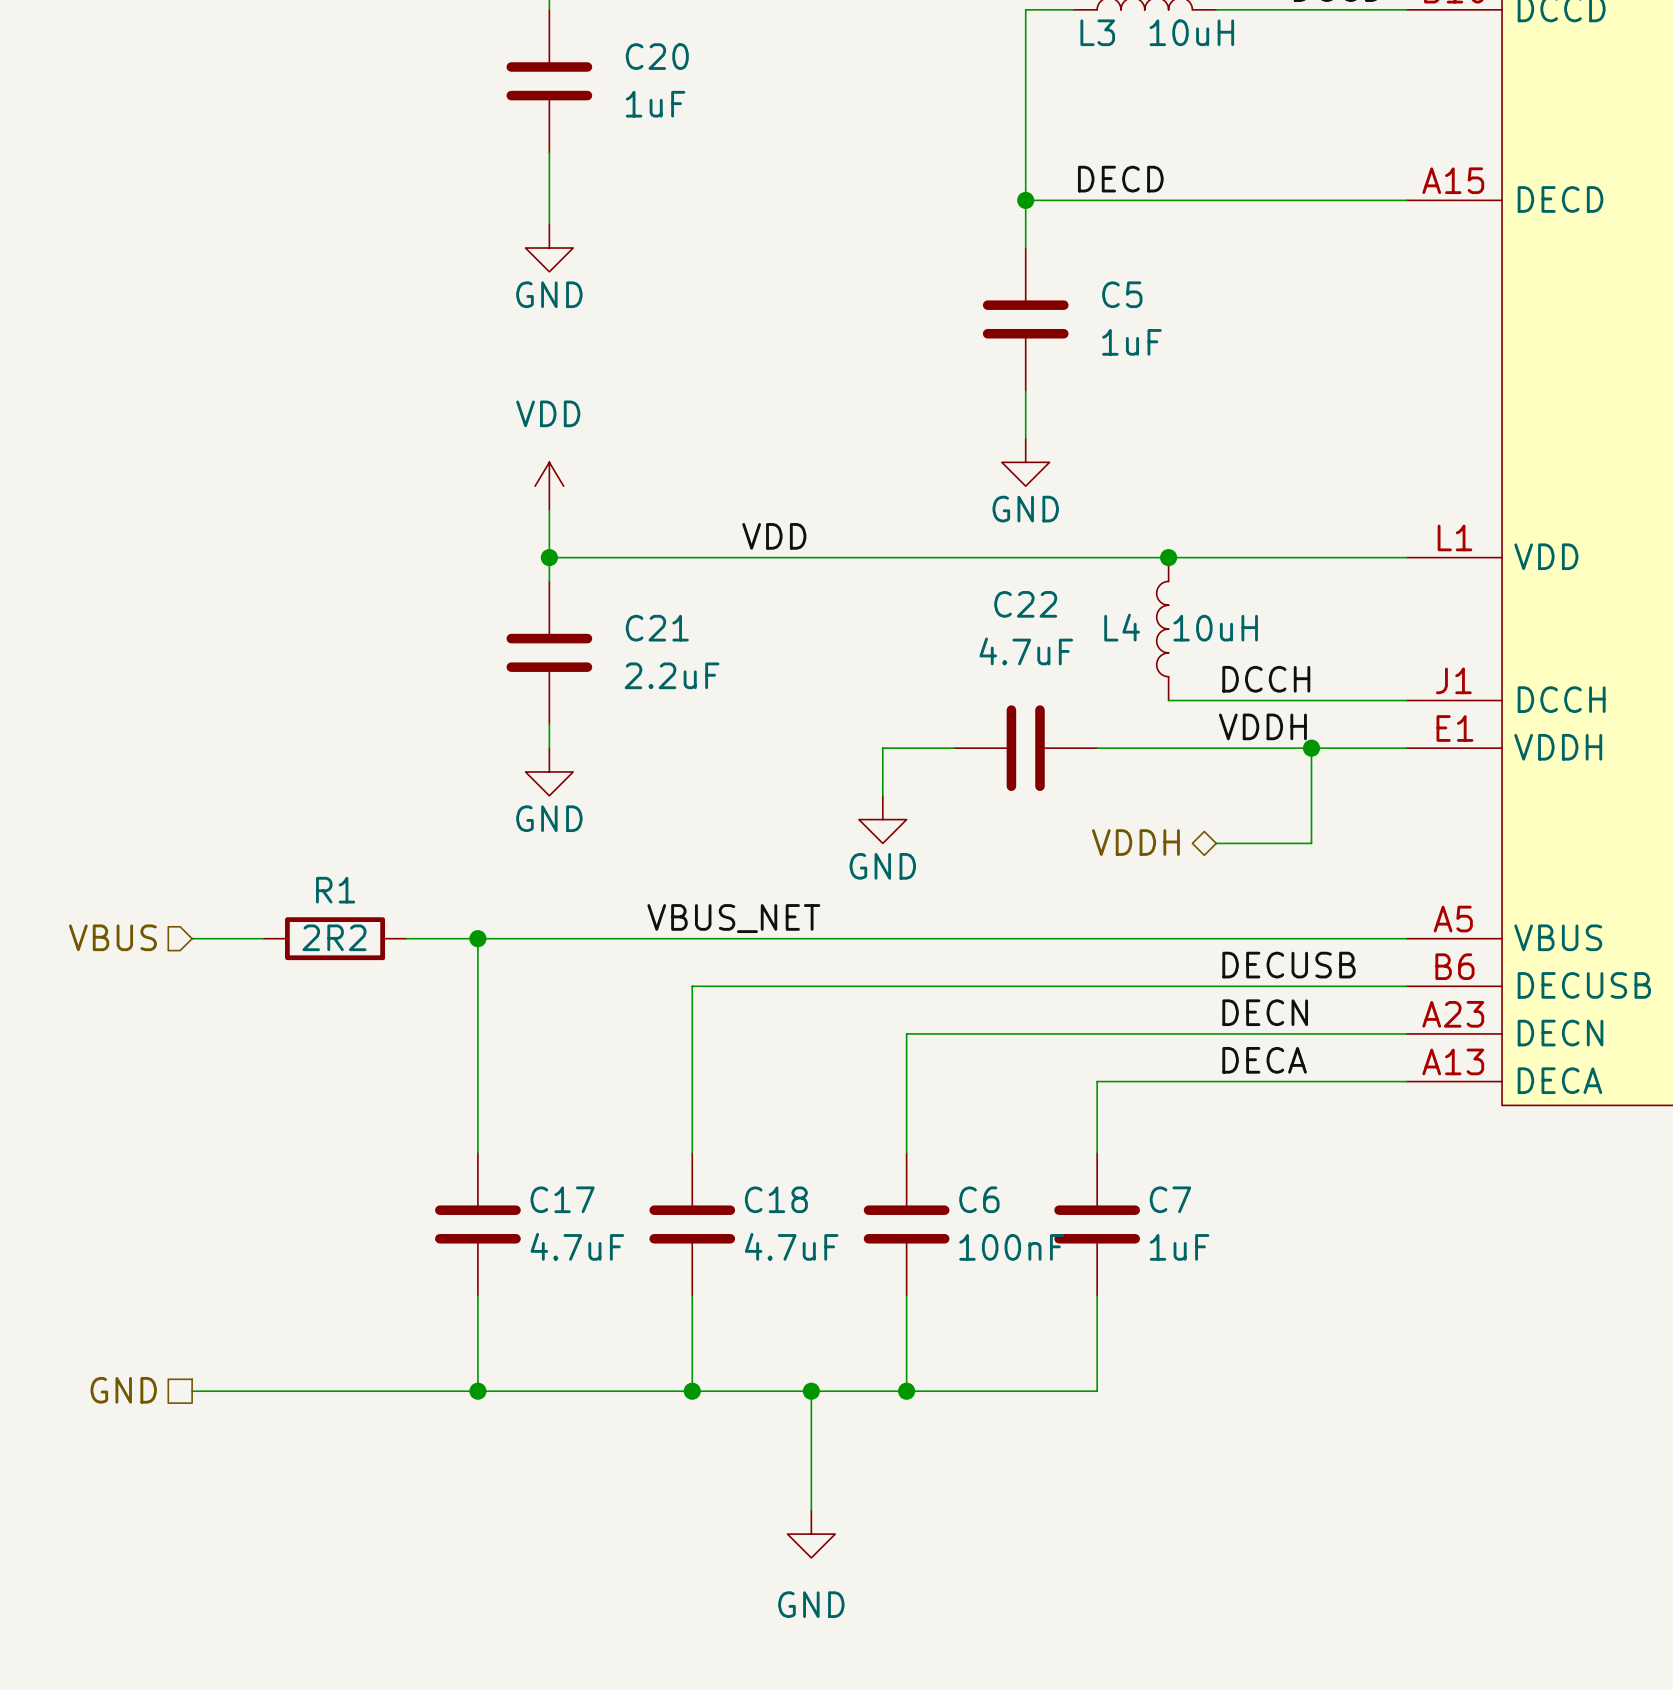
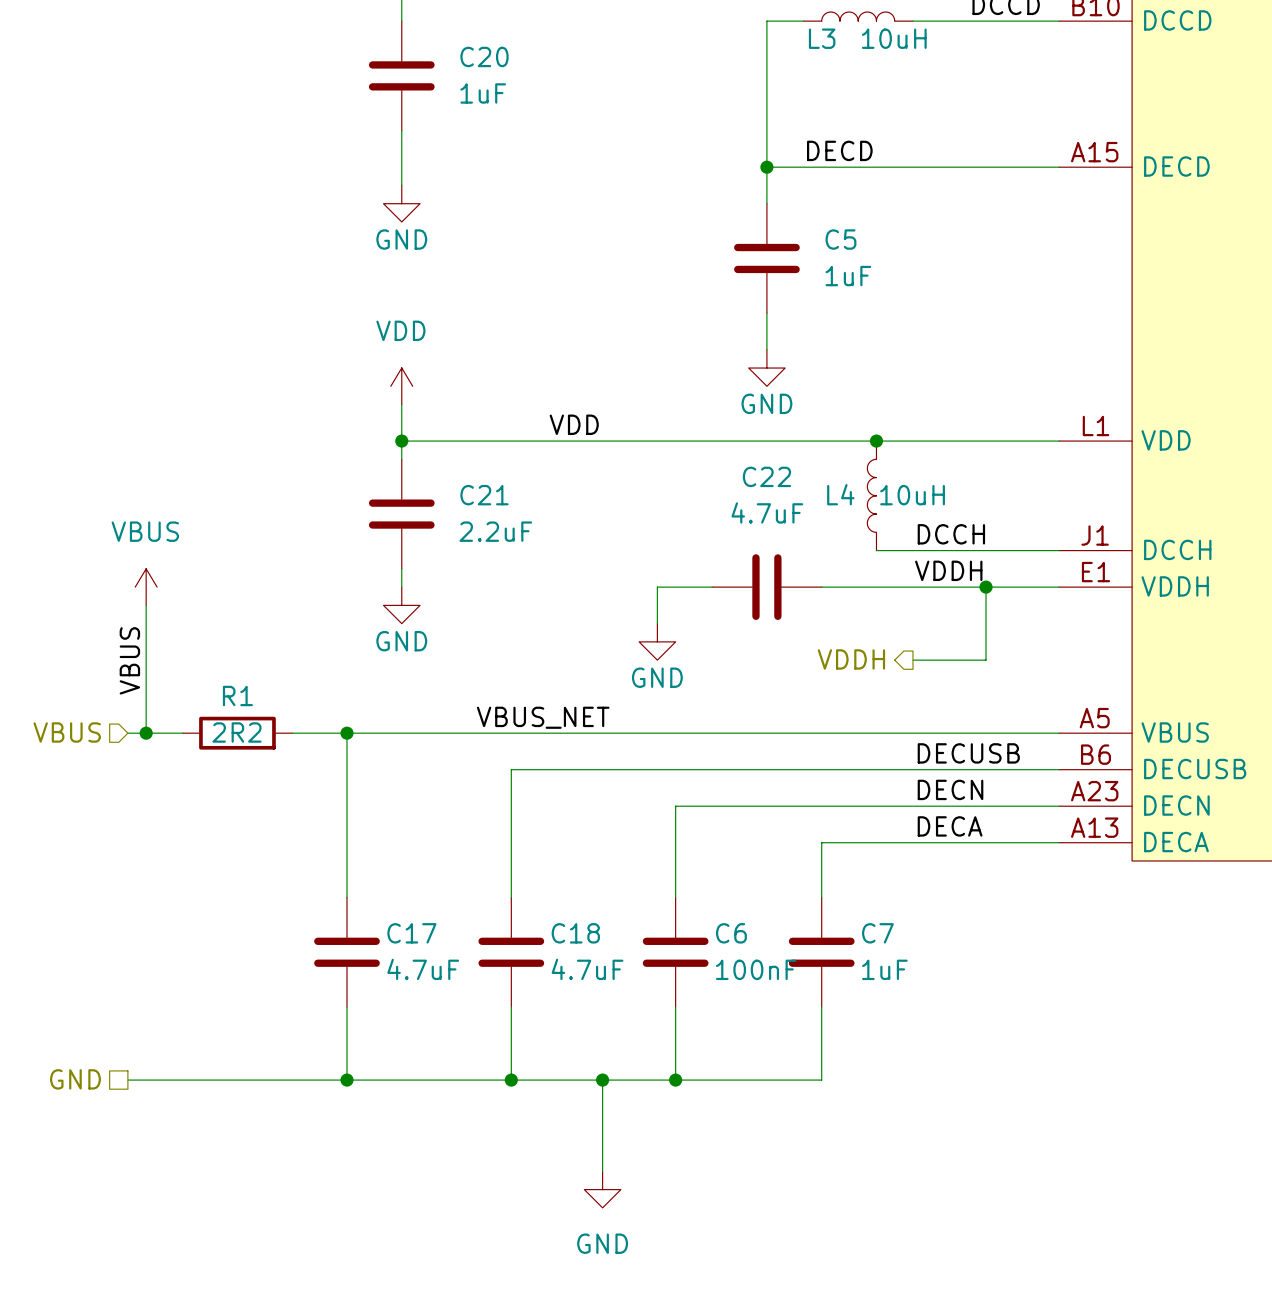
power symbol: none -> VBUS (146, 587)
wire: none -> (146, 605) (146, 733)
hierarchical label shape: bidirectional (1135, 842) -> output (851, 659)
label: none -> VBUS (129, 660)
junction: none -> (146, 733)

